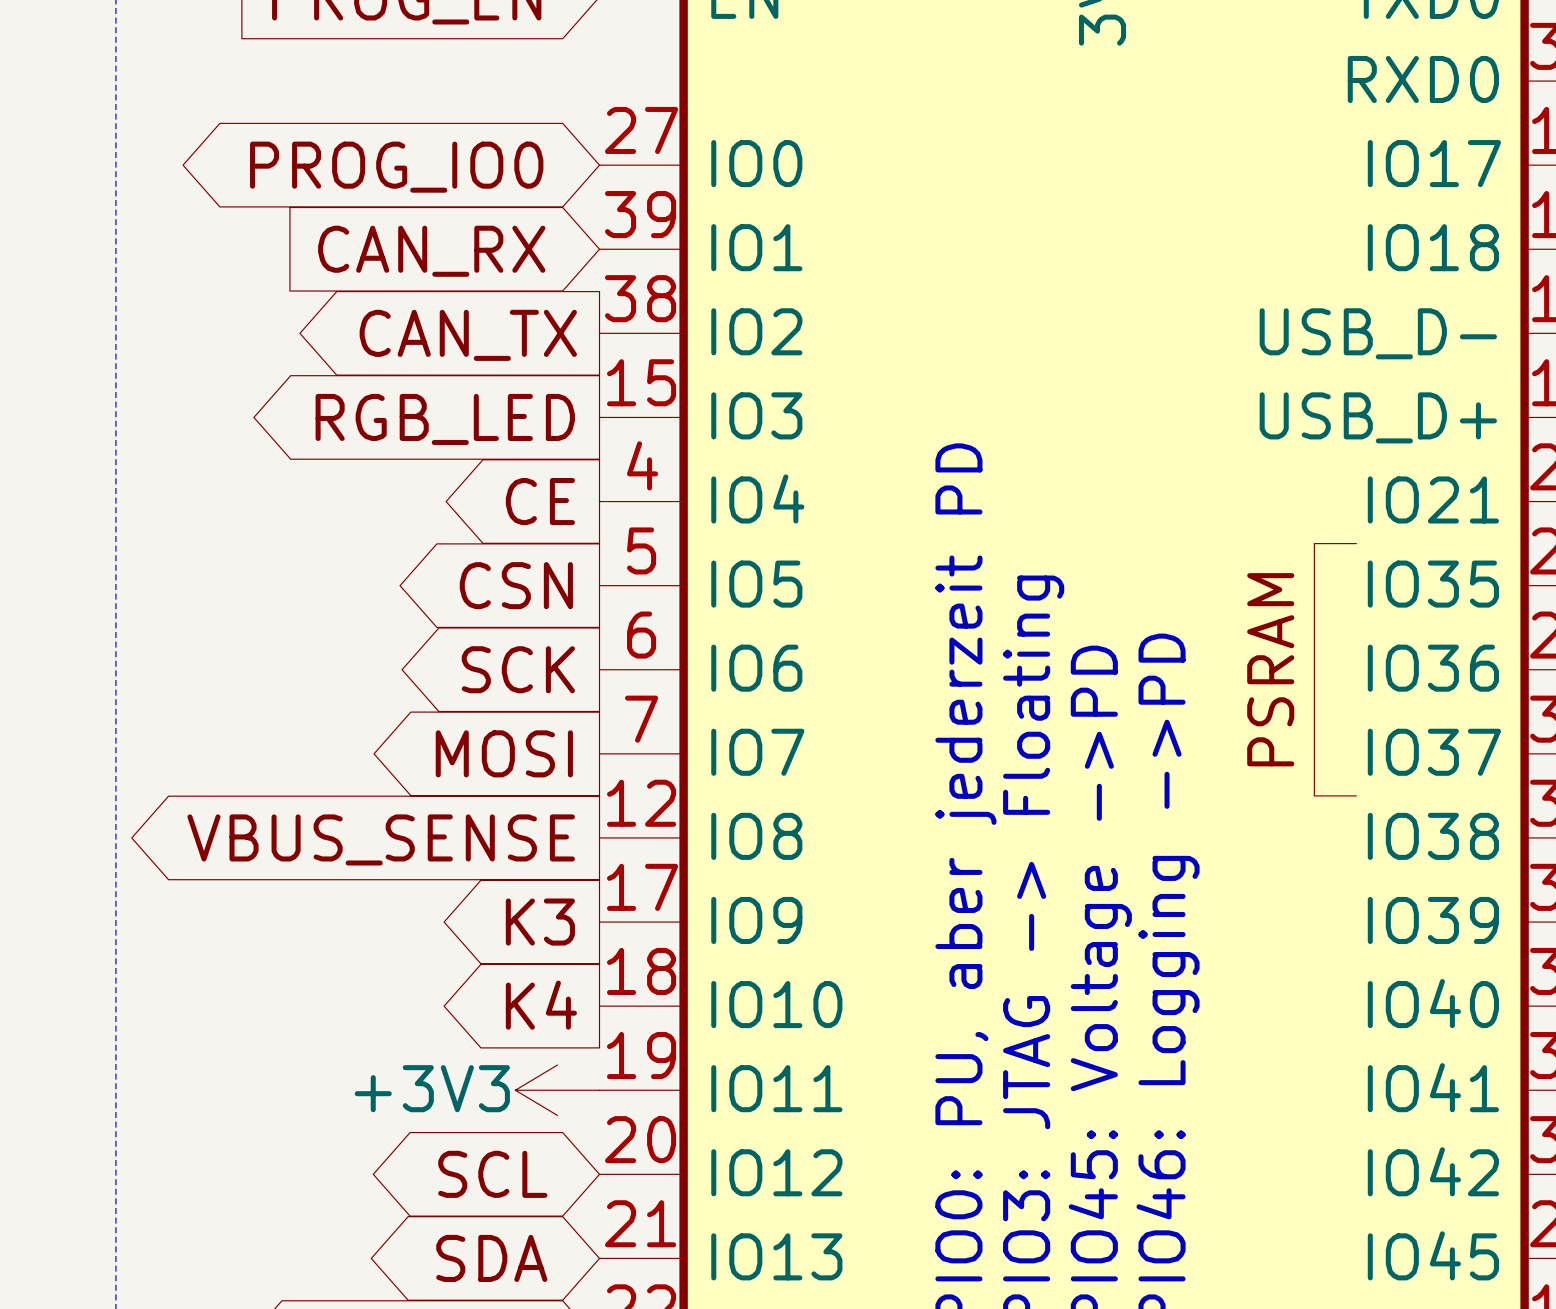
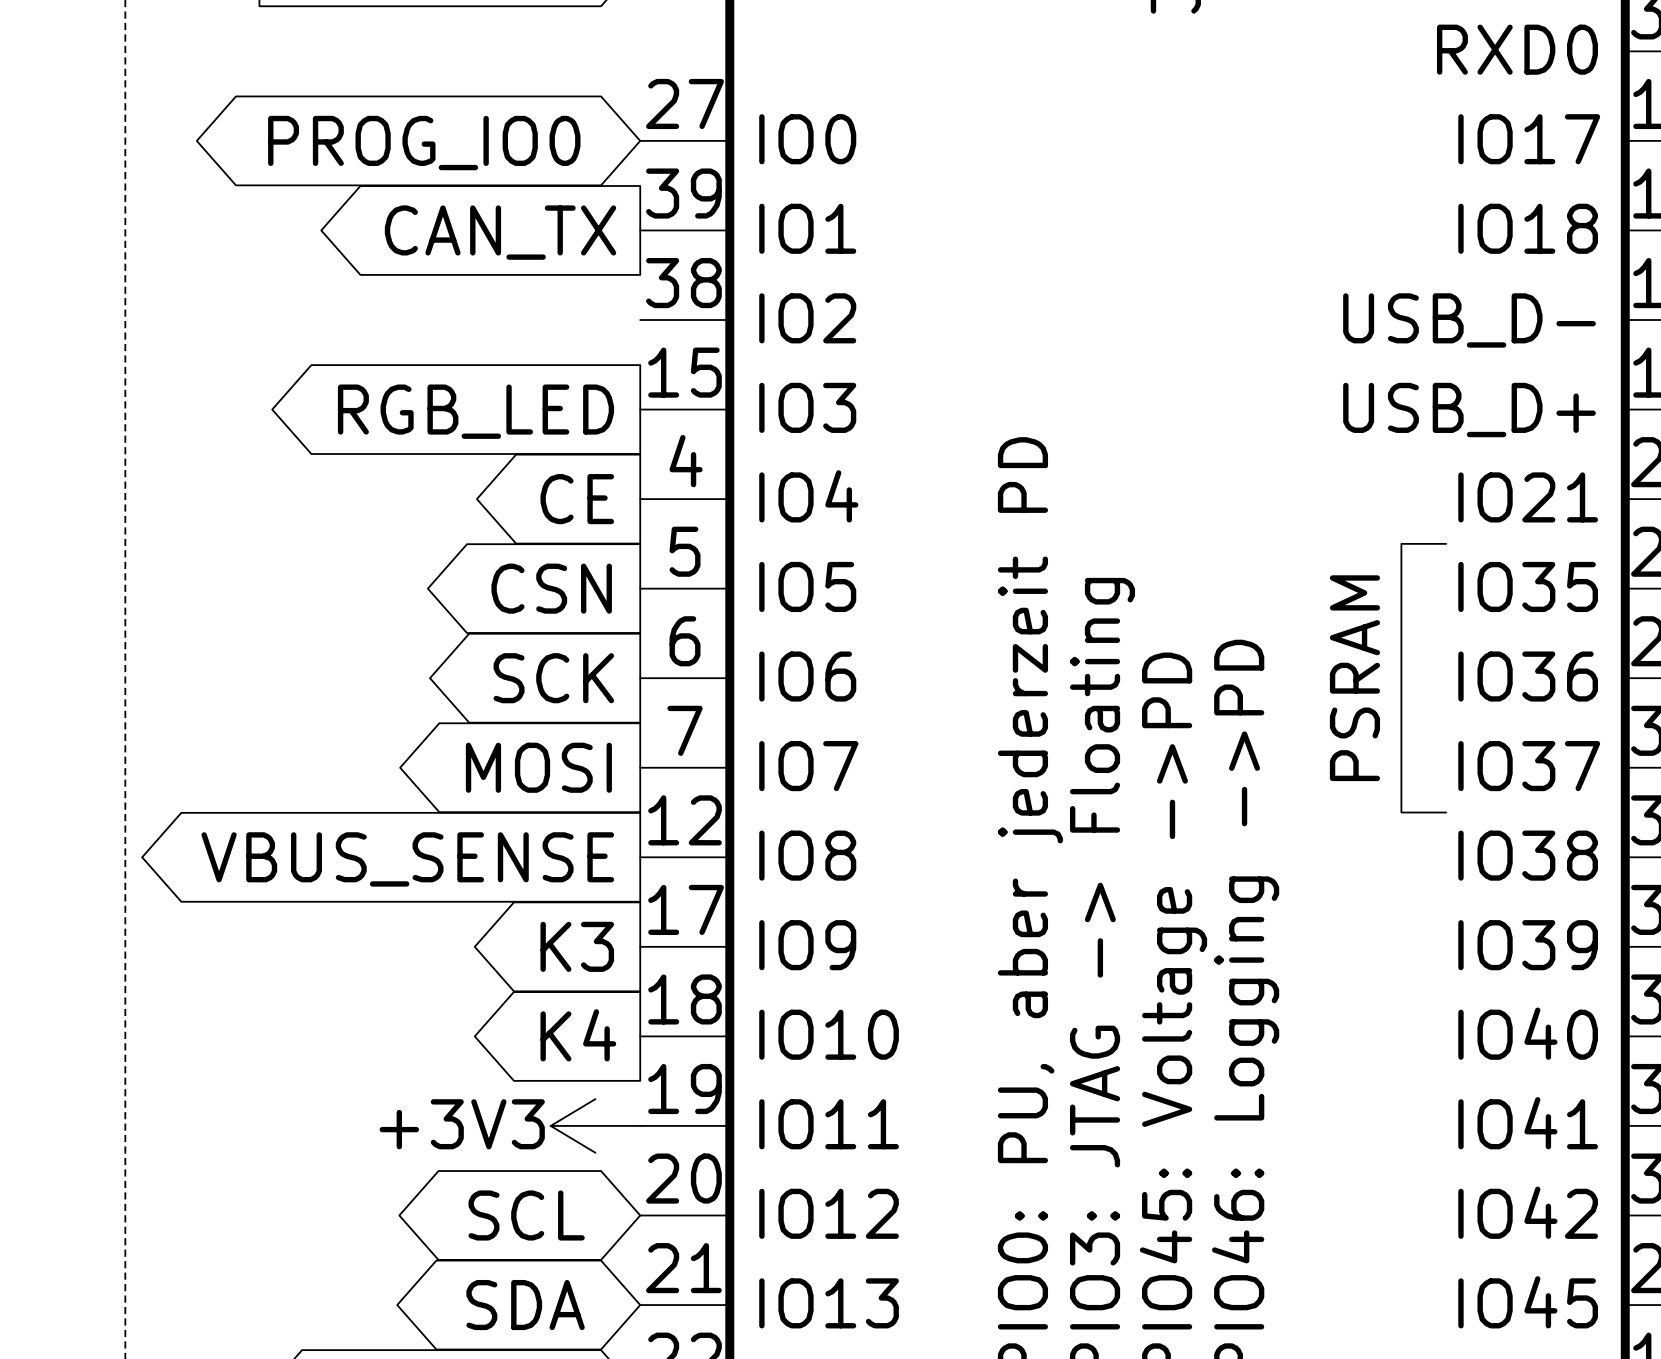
global label shape: input (431, 251) -> output (500, 232)
global label: CAN_RX (431, 251) -> CAN_TX (500, 232)
global label: CAN_TX (468, 335) -> none

